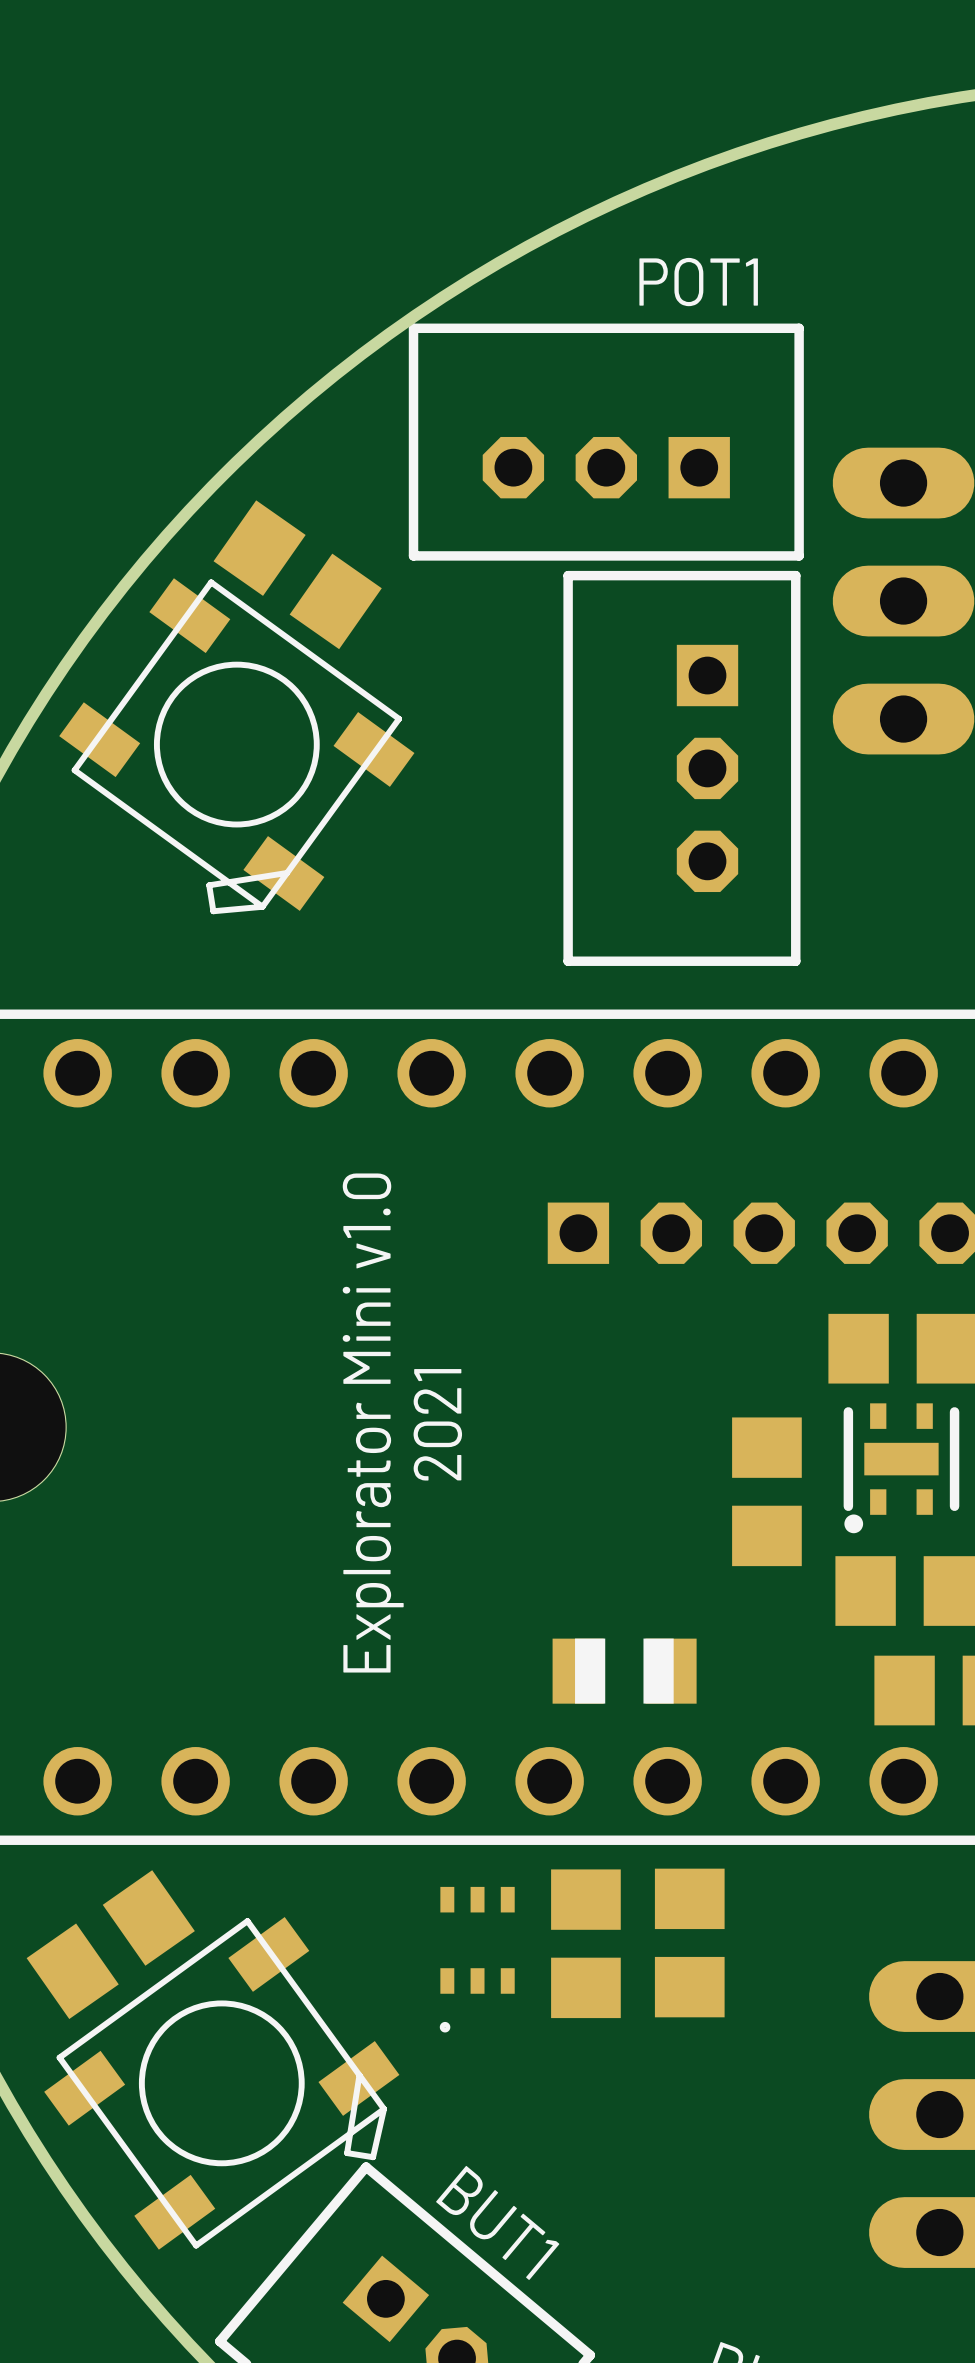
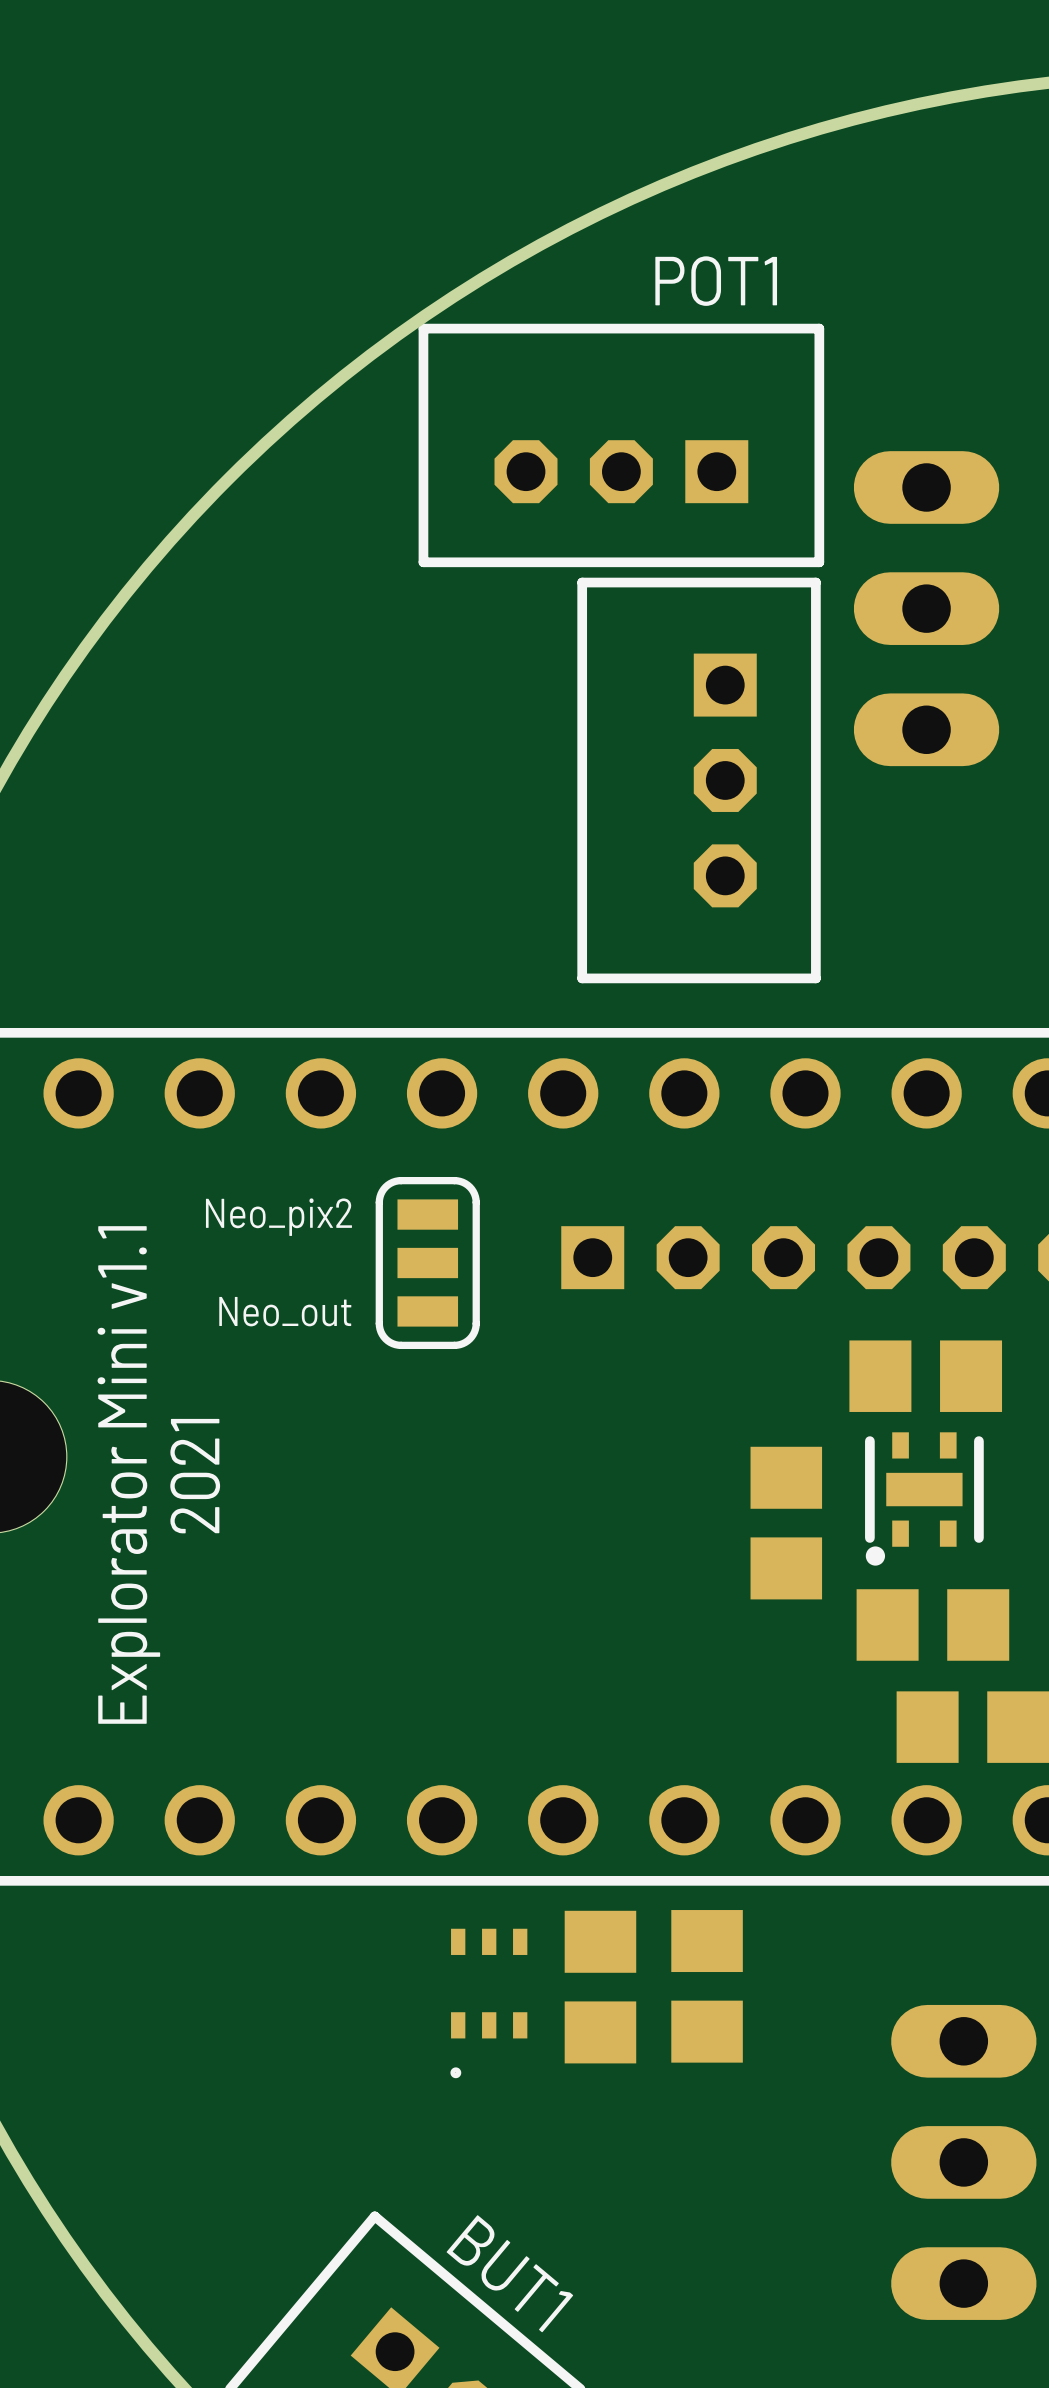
part: (297, 574) -> none
part: (236, 746) -> none
text: none -> Neo_pix2 (278, 1217)
part: none -> (427, 1263)
text: none -> Neo_out (285, 1311)
text: Explorator Mini v1.0 (373, 1423) -> none
text position: 2021 (437, 1424) -> 2021 (195, 1476)
text: none -> Explorator Mini v1.1 (128, 1474)
part: (624, 1671) -> none
part: (110, 1944) -> none
part: (221, 2083) -> none

